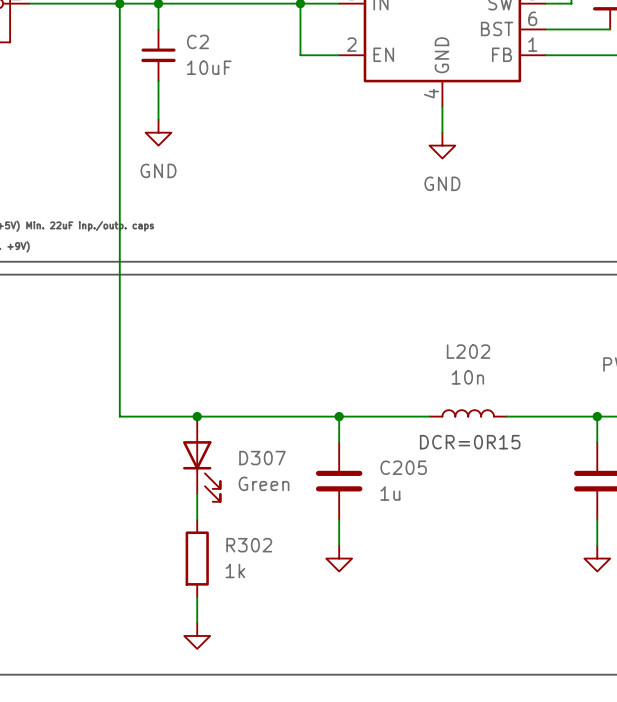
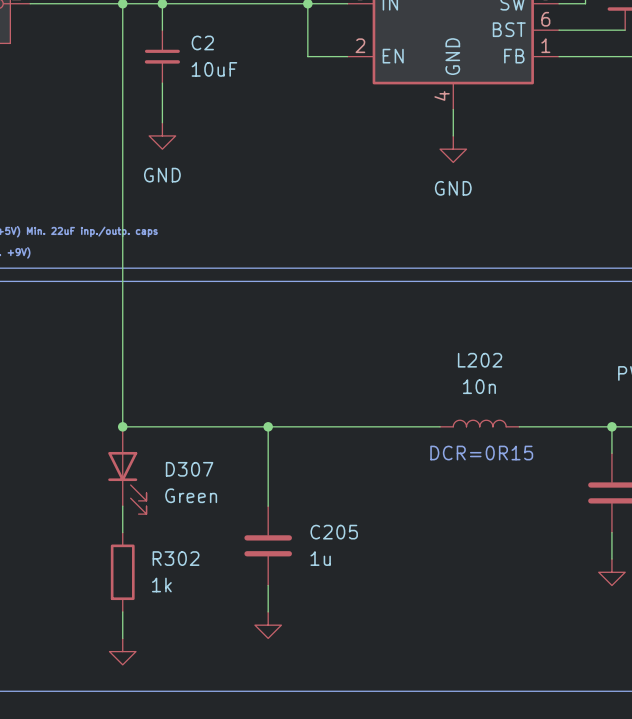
junction: none -> (122, 426)
junction: (197, 416) -> none
wire: none -> (268, 426) (268, 506)
junction: none -> (268, 426)
wire: (339, 416) (339, 442) -> none
junction: (339, 416) -> none
D307 position: (201, 459) -> (127, 470)
C205 position: (339, 481) -> (268, 545)
wire: (197, 494) (197, 519) -> (122, 506) (122, 532)
wire: (339, 519) (339, 545) -> (268, 585) (268, 611)
R302 position: (197, 558) -> (122, 572)
power symbol: (339, 558) -> none
wire: (197, 597) (197, 623) -> (122, 611) (122, 638)
power symbol: none -> (268, 625)
power symbol: none -> (122, 651)
power symbol: (197, 635) -> none

